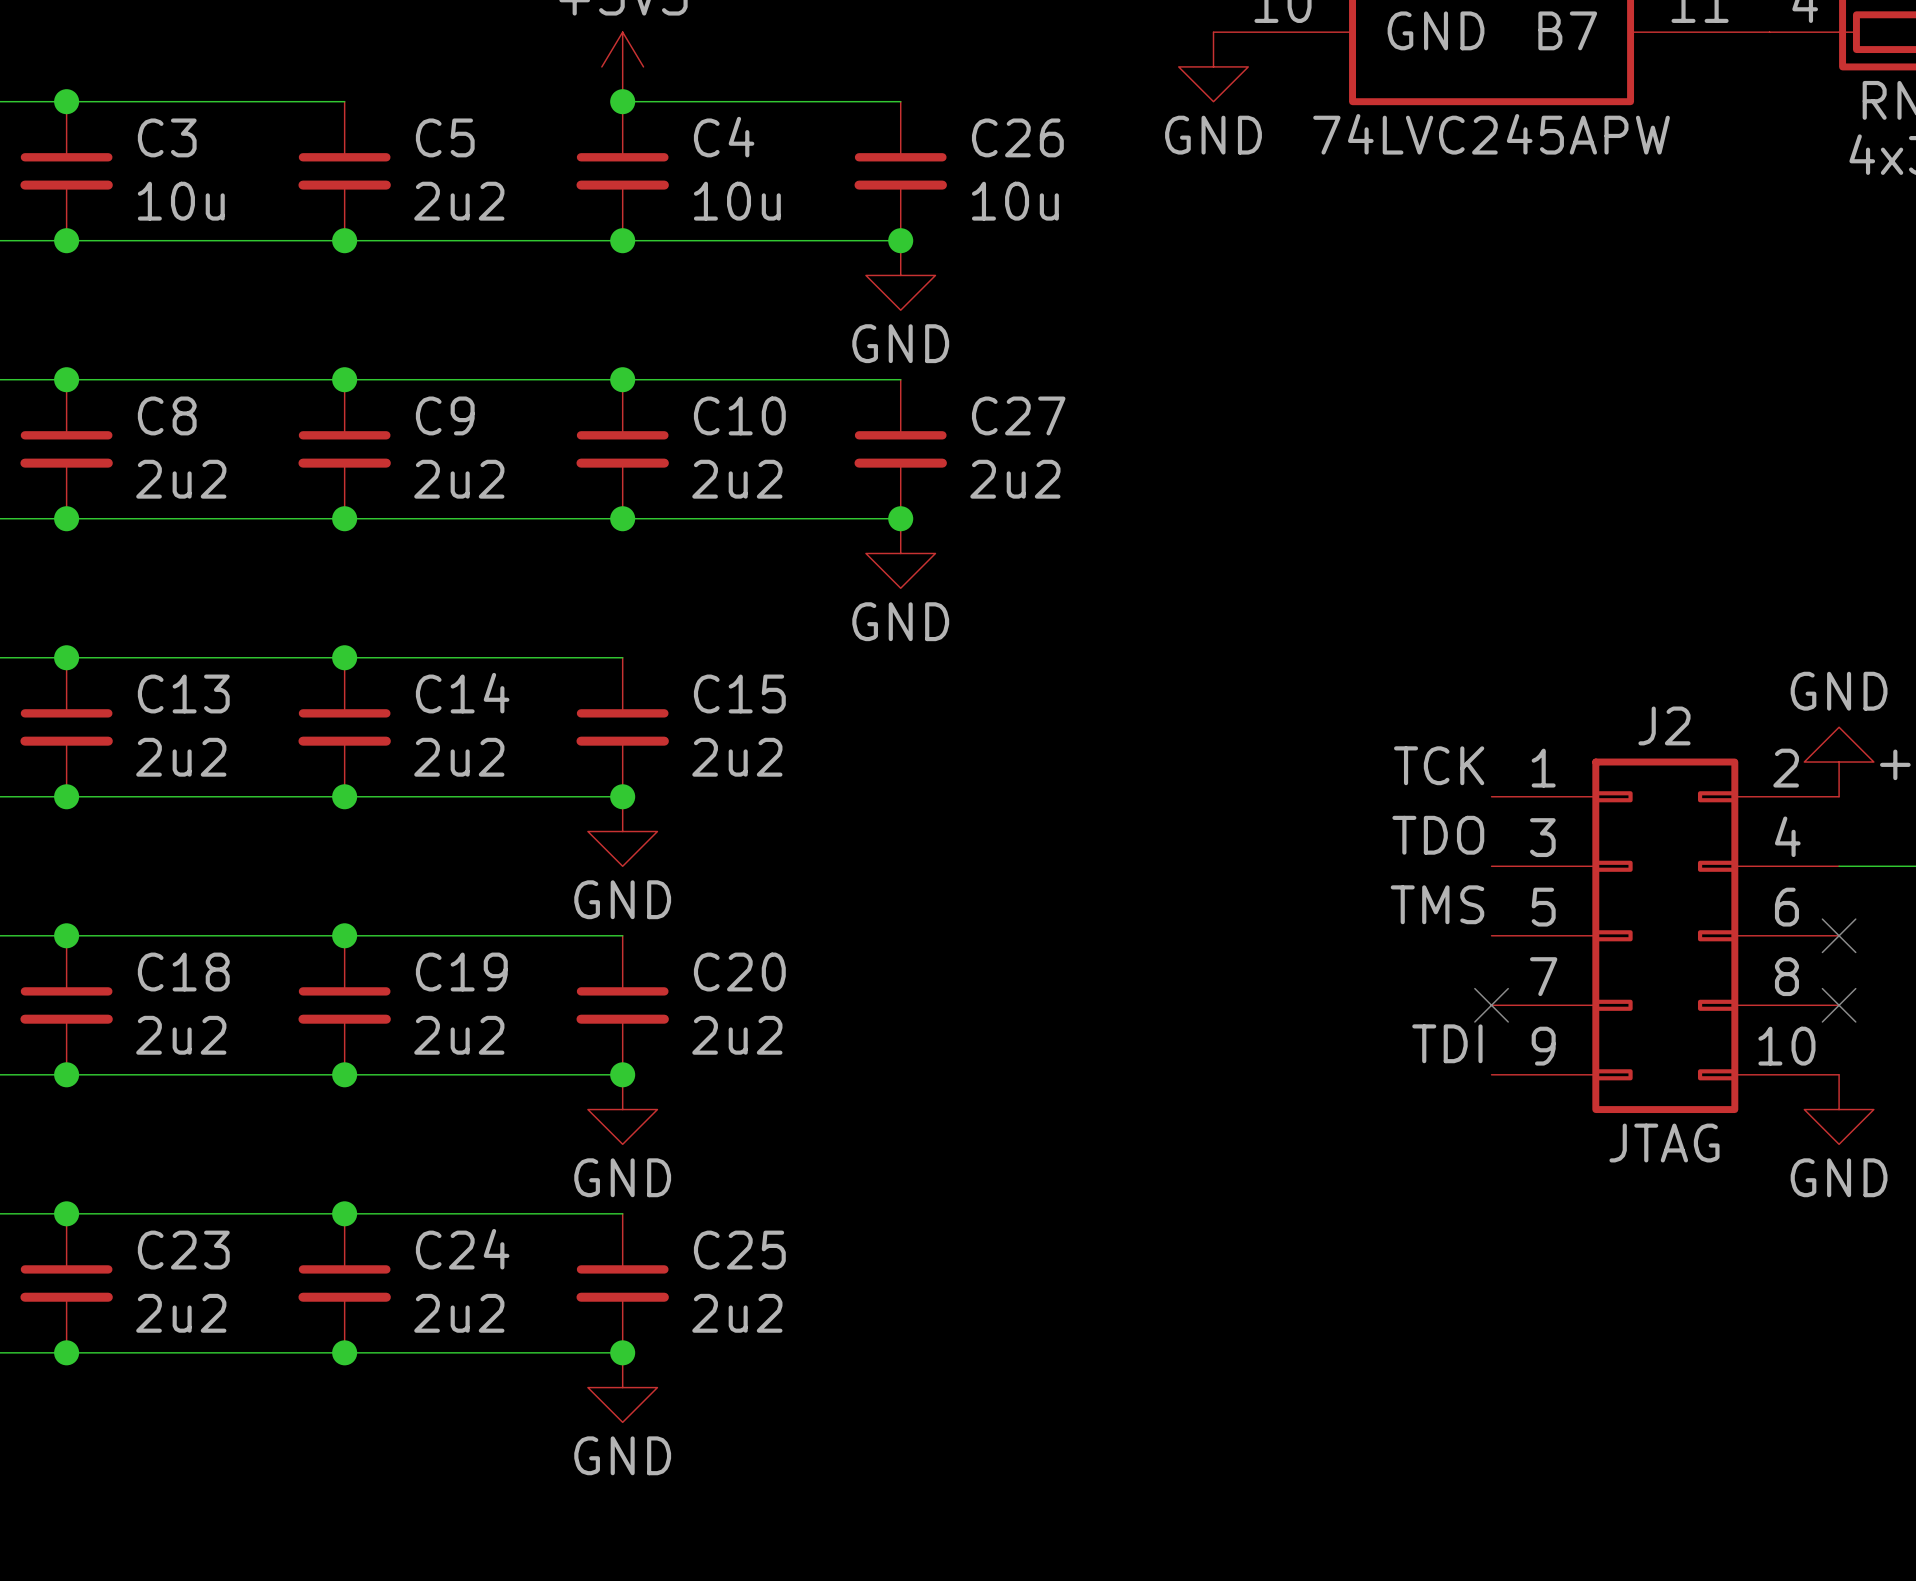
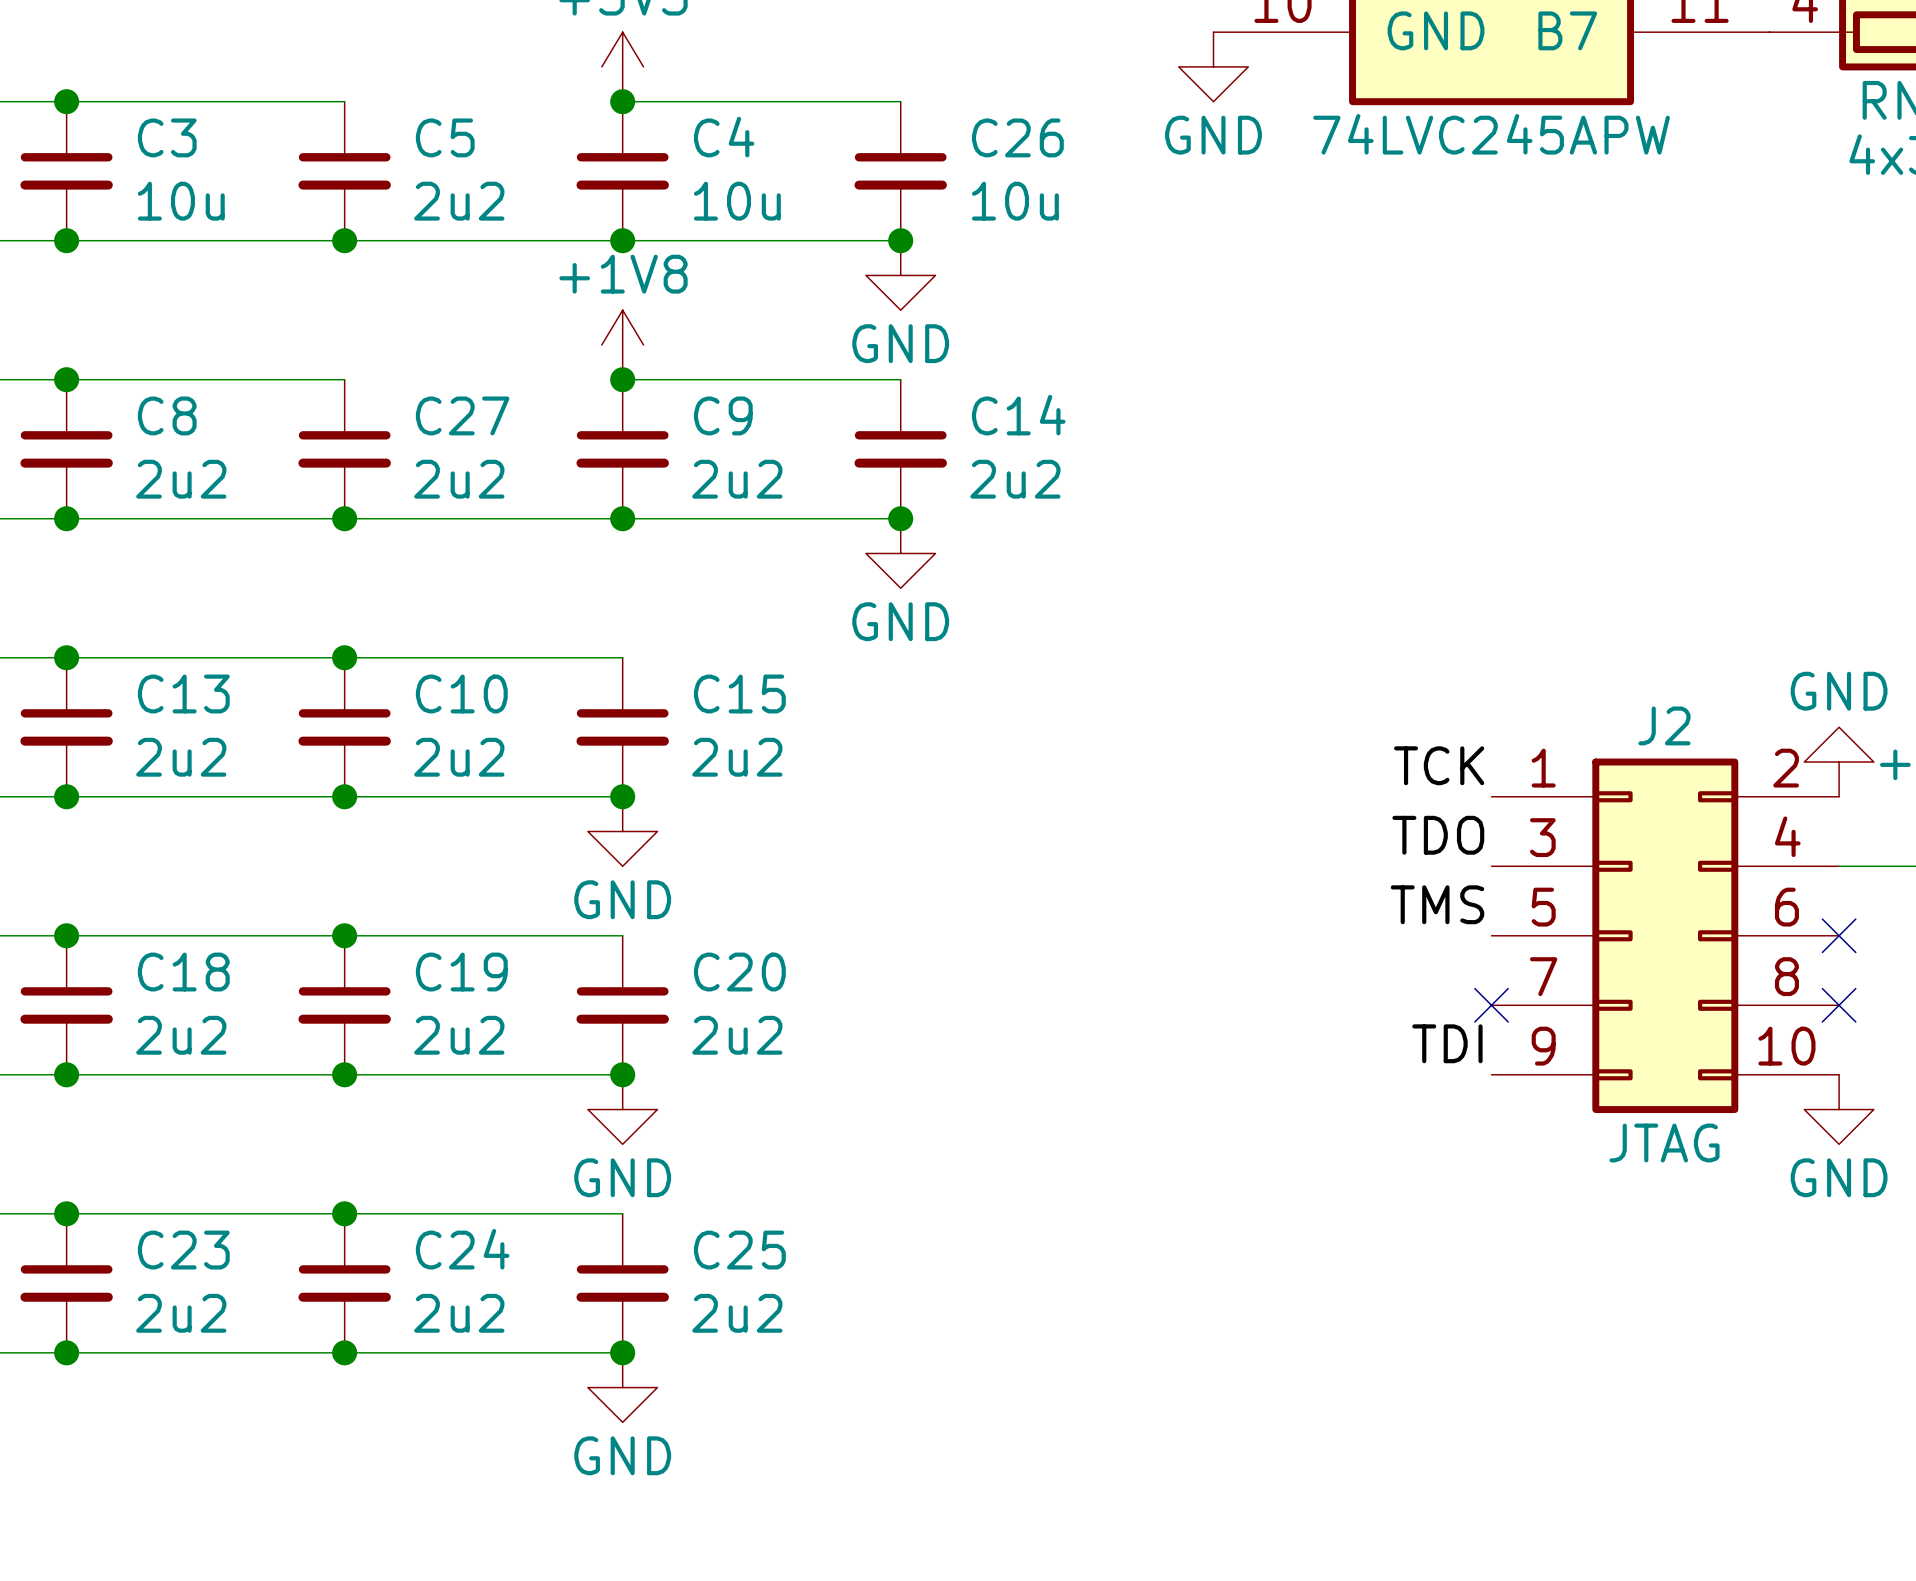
power symbol: none -> +1V8 (622, 344)
wire: (344, 379) (622, 379) -> none
junction: (344, 379) -> none
C9 name: C9 (445, 415) -> C27 (462, 415)
C10 name: C10 (739, 415) -> C9 (723, 415)
C27 name: C27 (1018, 415) -> C14 (1018, 415)
C14 name: C14 (462, 693) -> C10 (461, 693)

